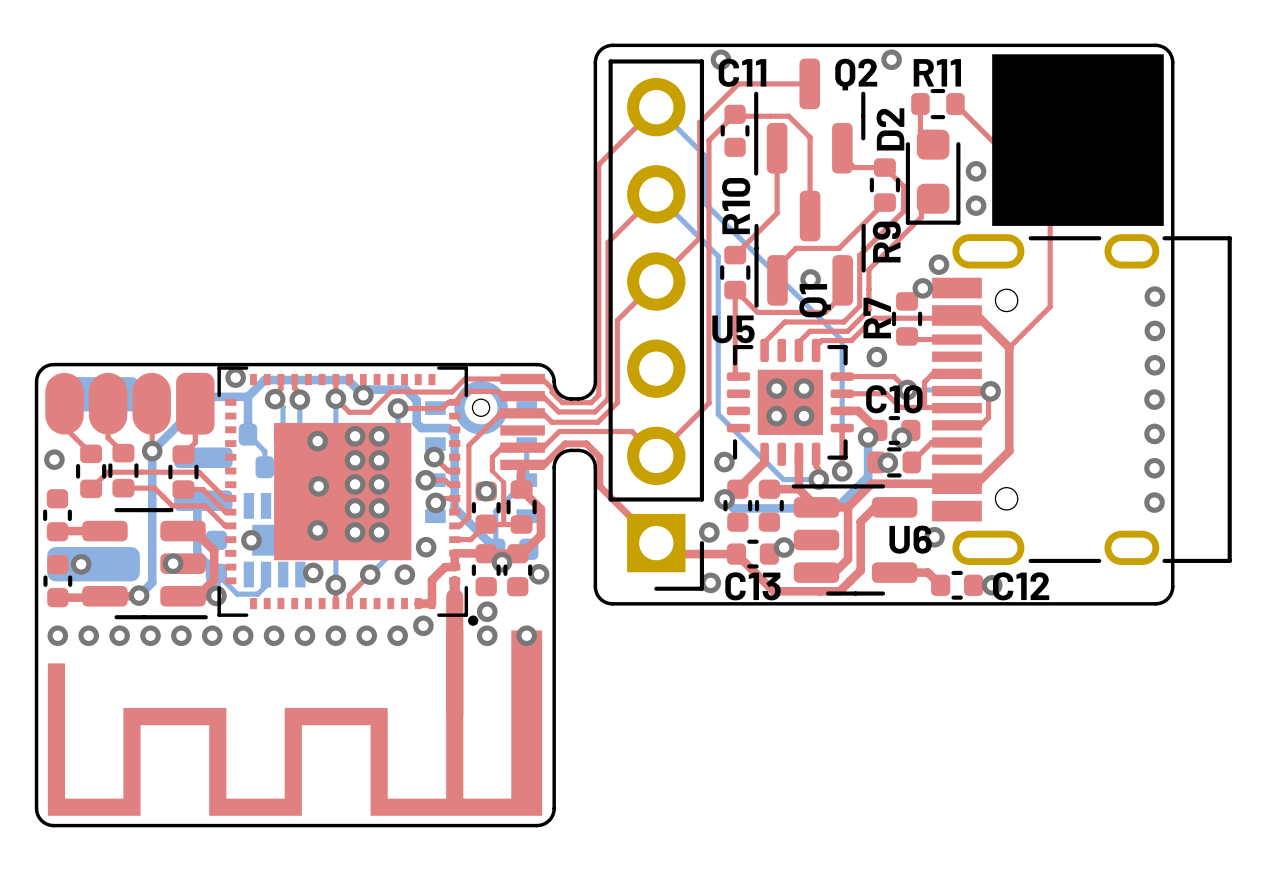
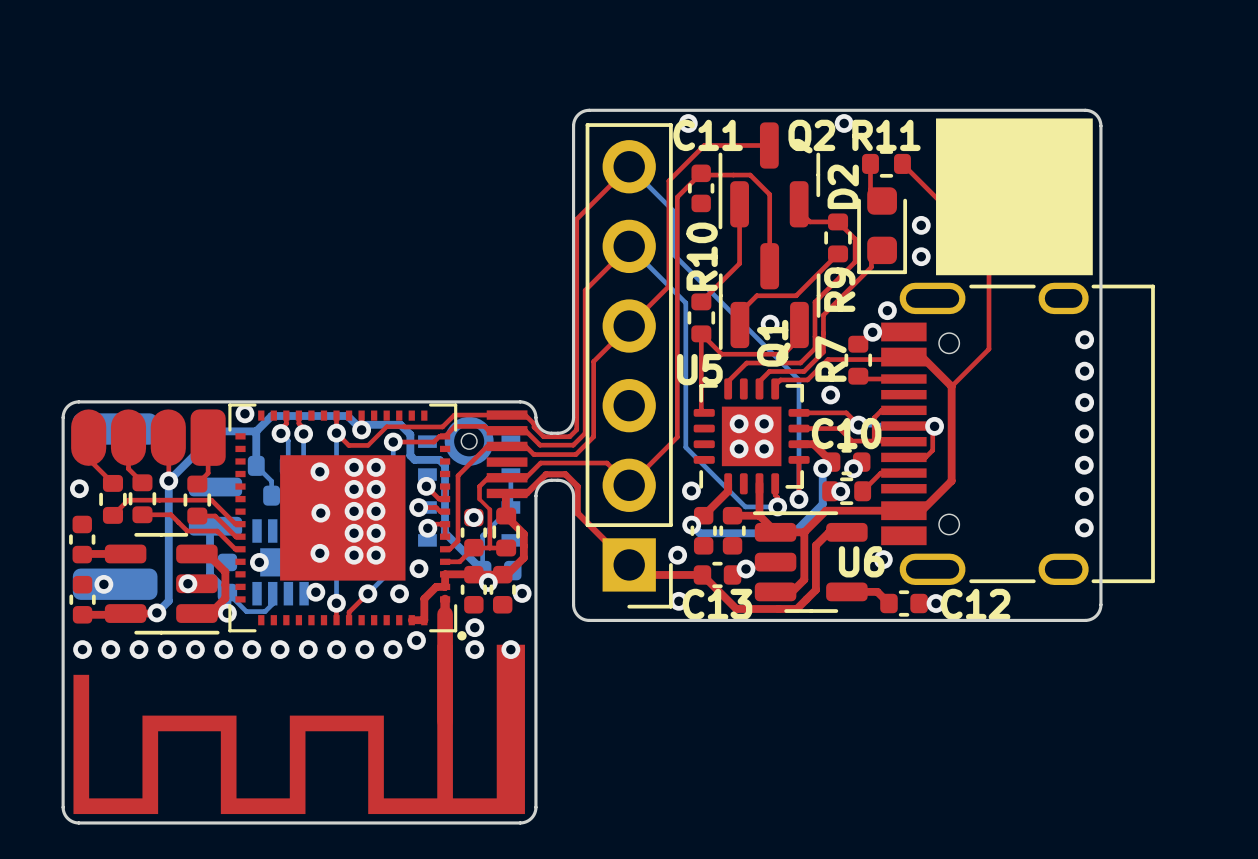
top track: none -> (445, 486) (445, 499)

